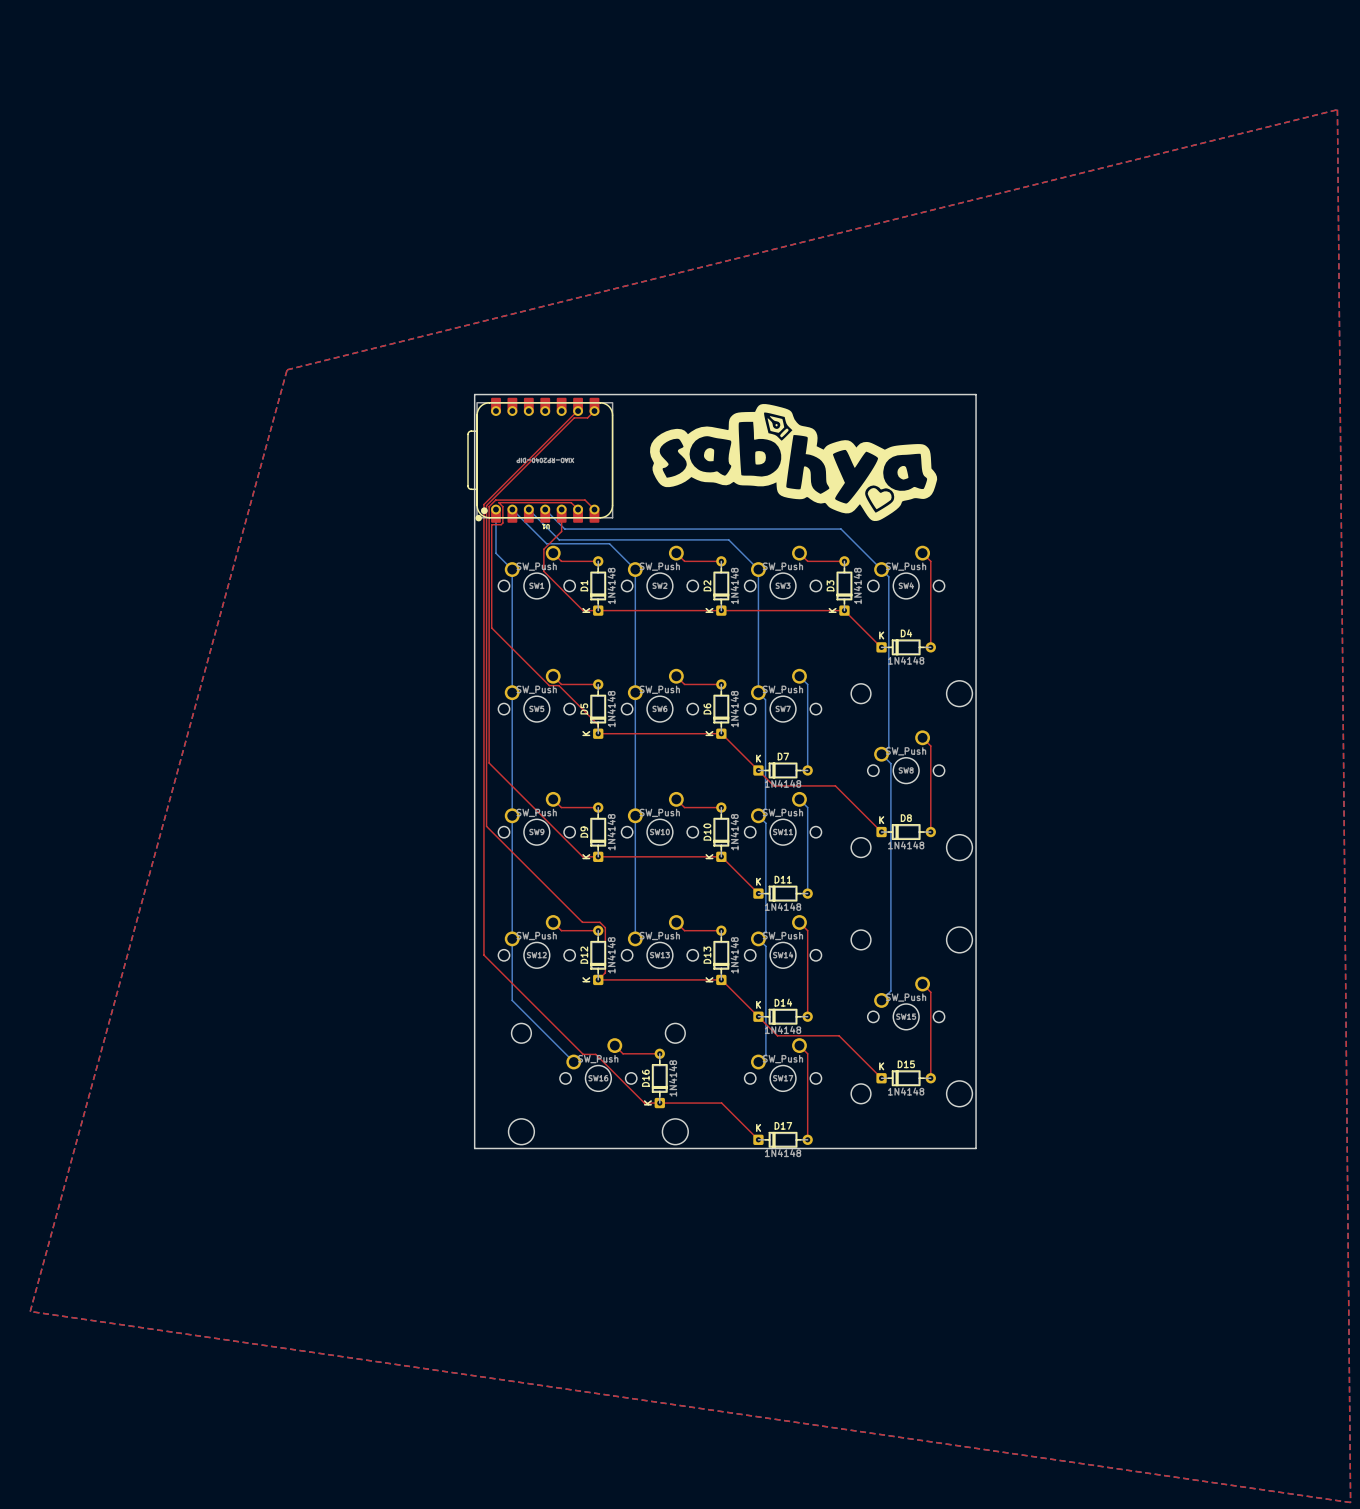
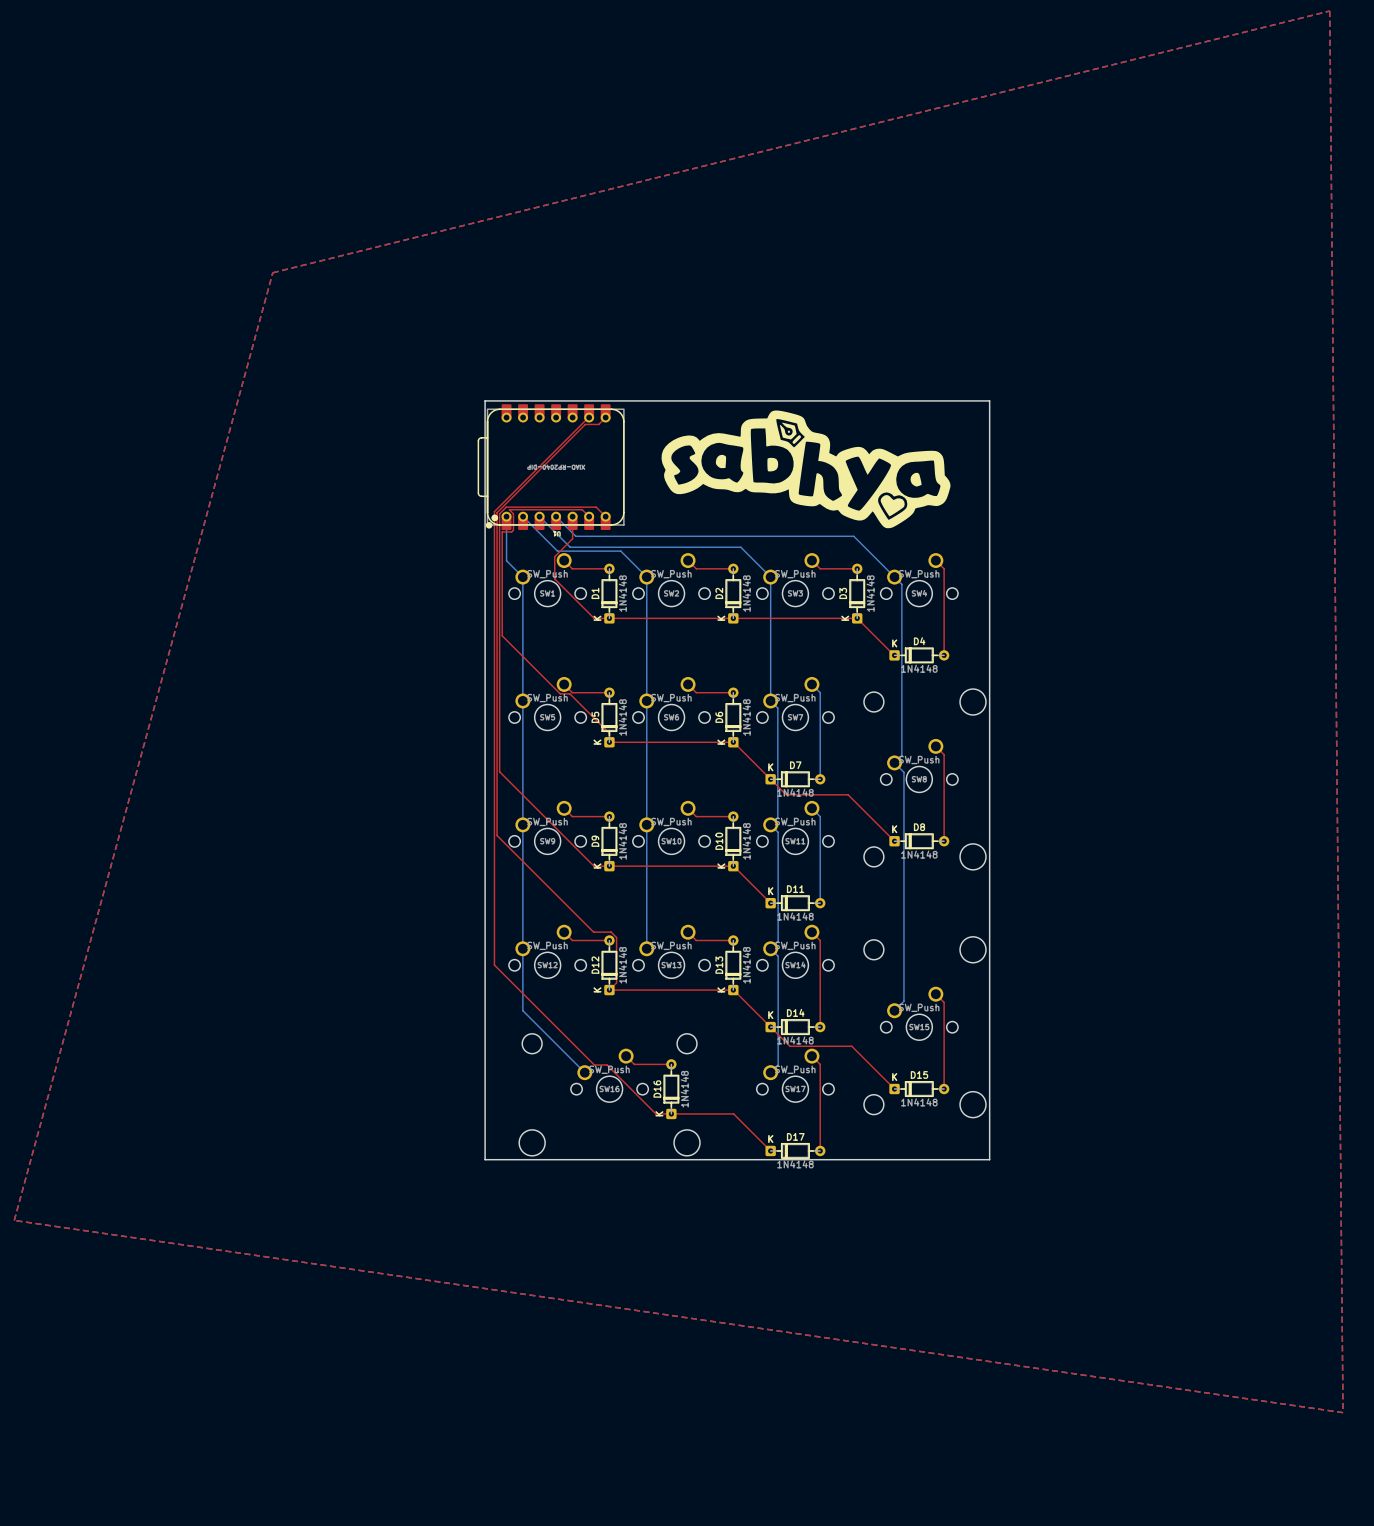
top zone outline: (287, 369) (1337, 109) (1350, 1502) (30, 1311) (287, 369) -> (272, 272) (1329, 11) (1343, 1412) (14, 1220) (272, 272)

